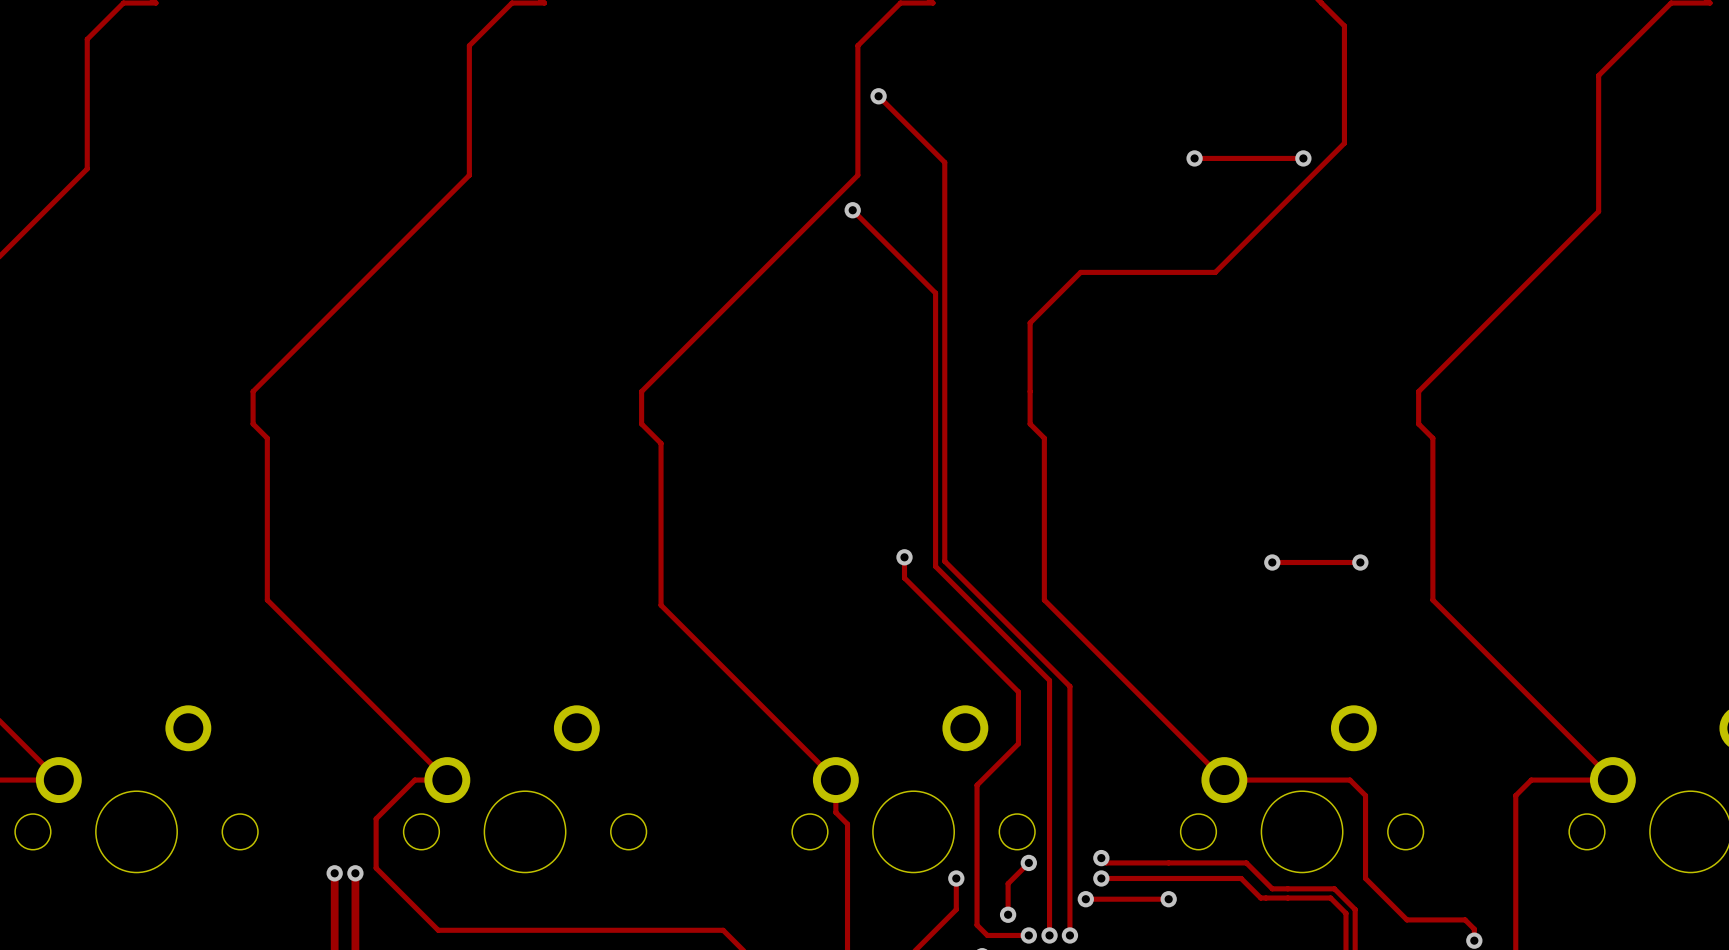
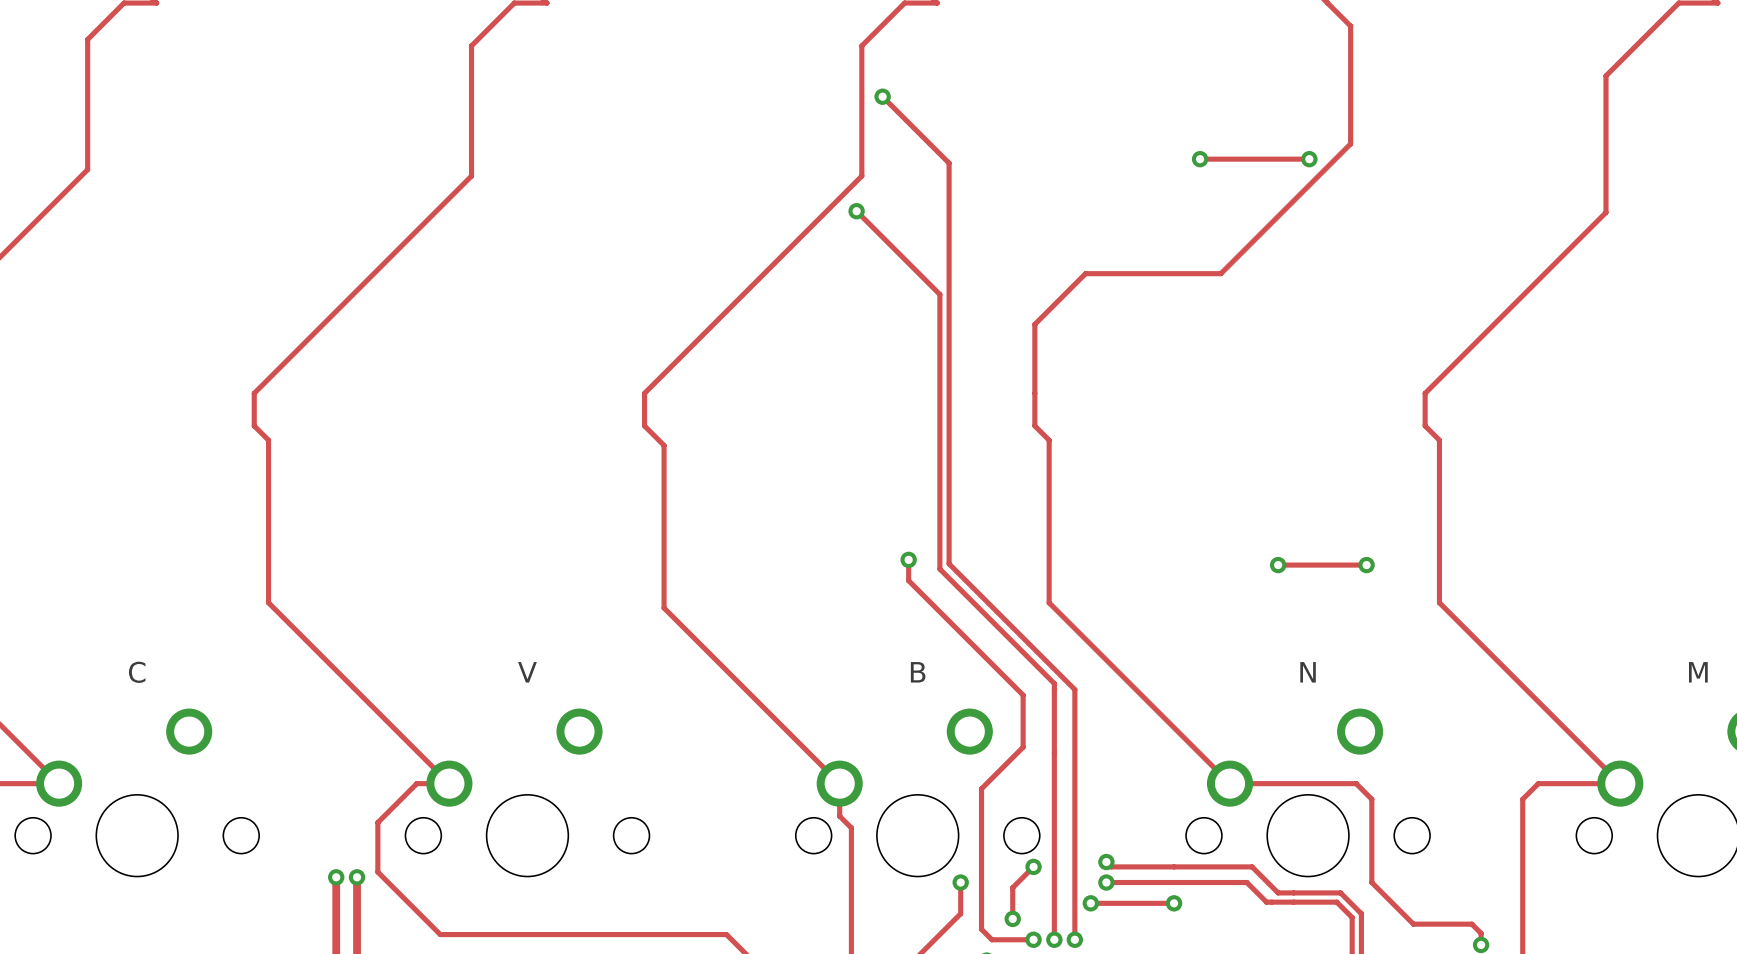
part value: none -> C (137, 672)
part value: none -> V (527, 672)
part value: none -> B (918, 672)
part value: none -> N (1308, 672)
part value: none -> M (1698, 672)

